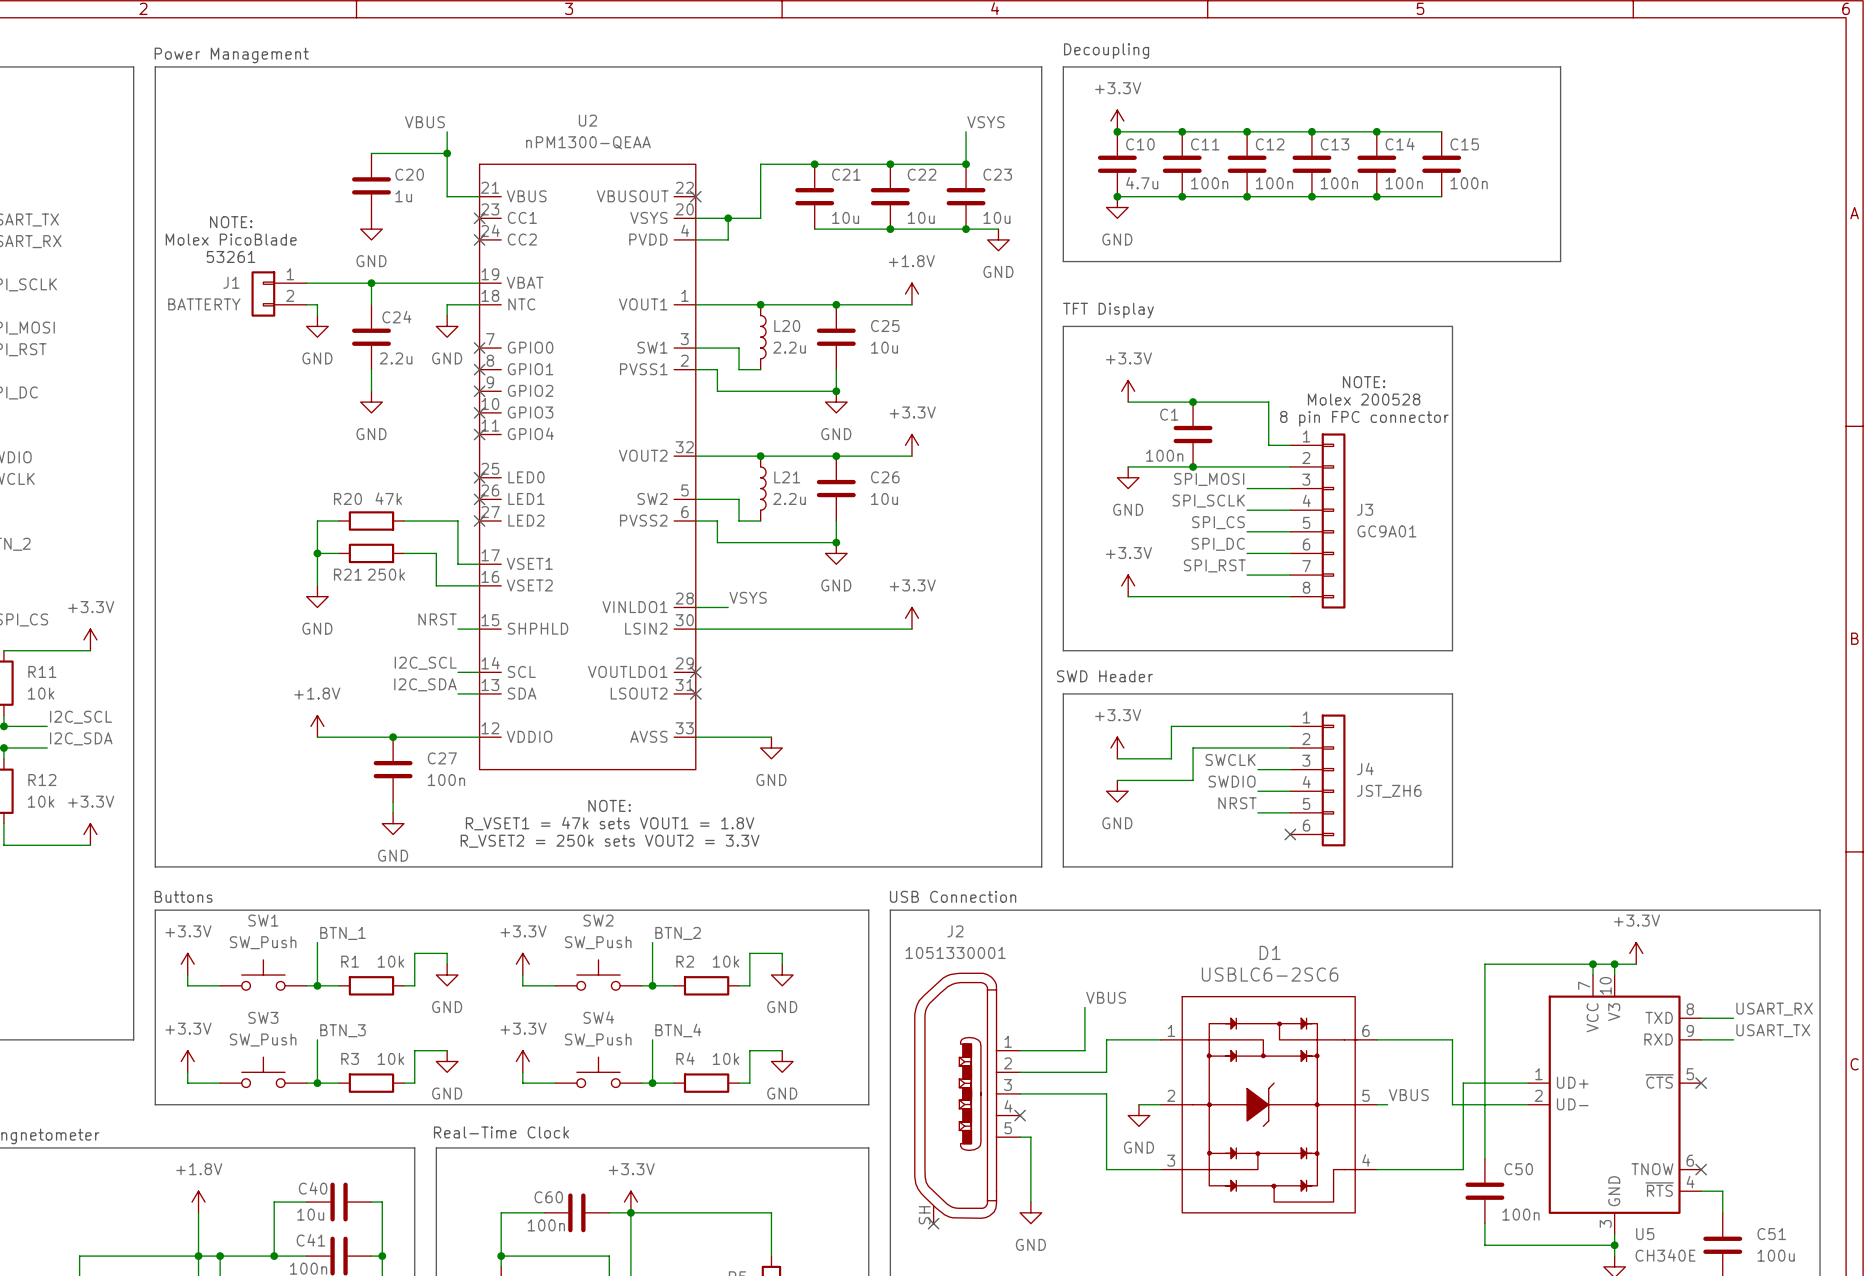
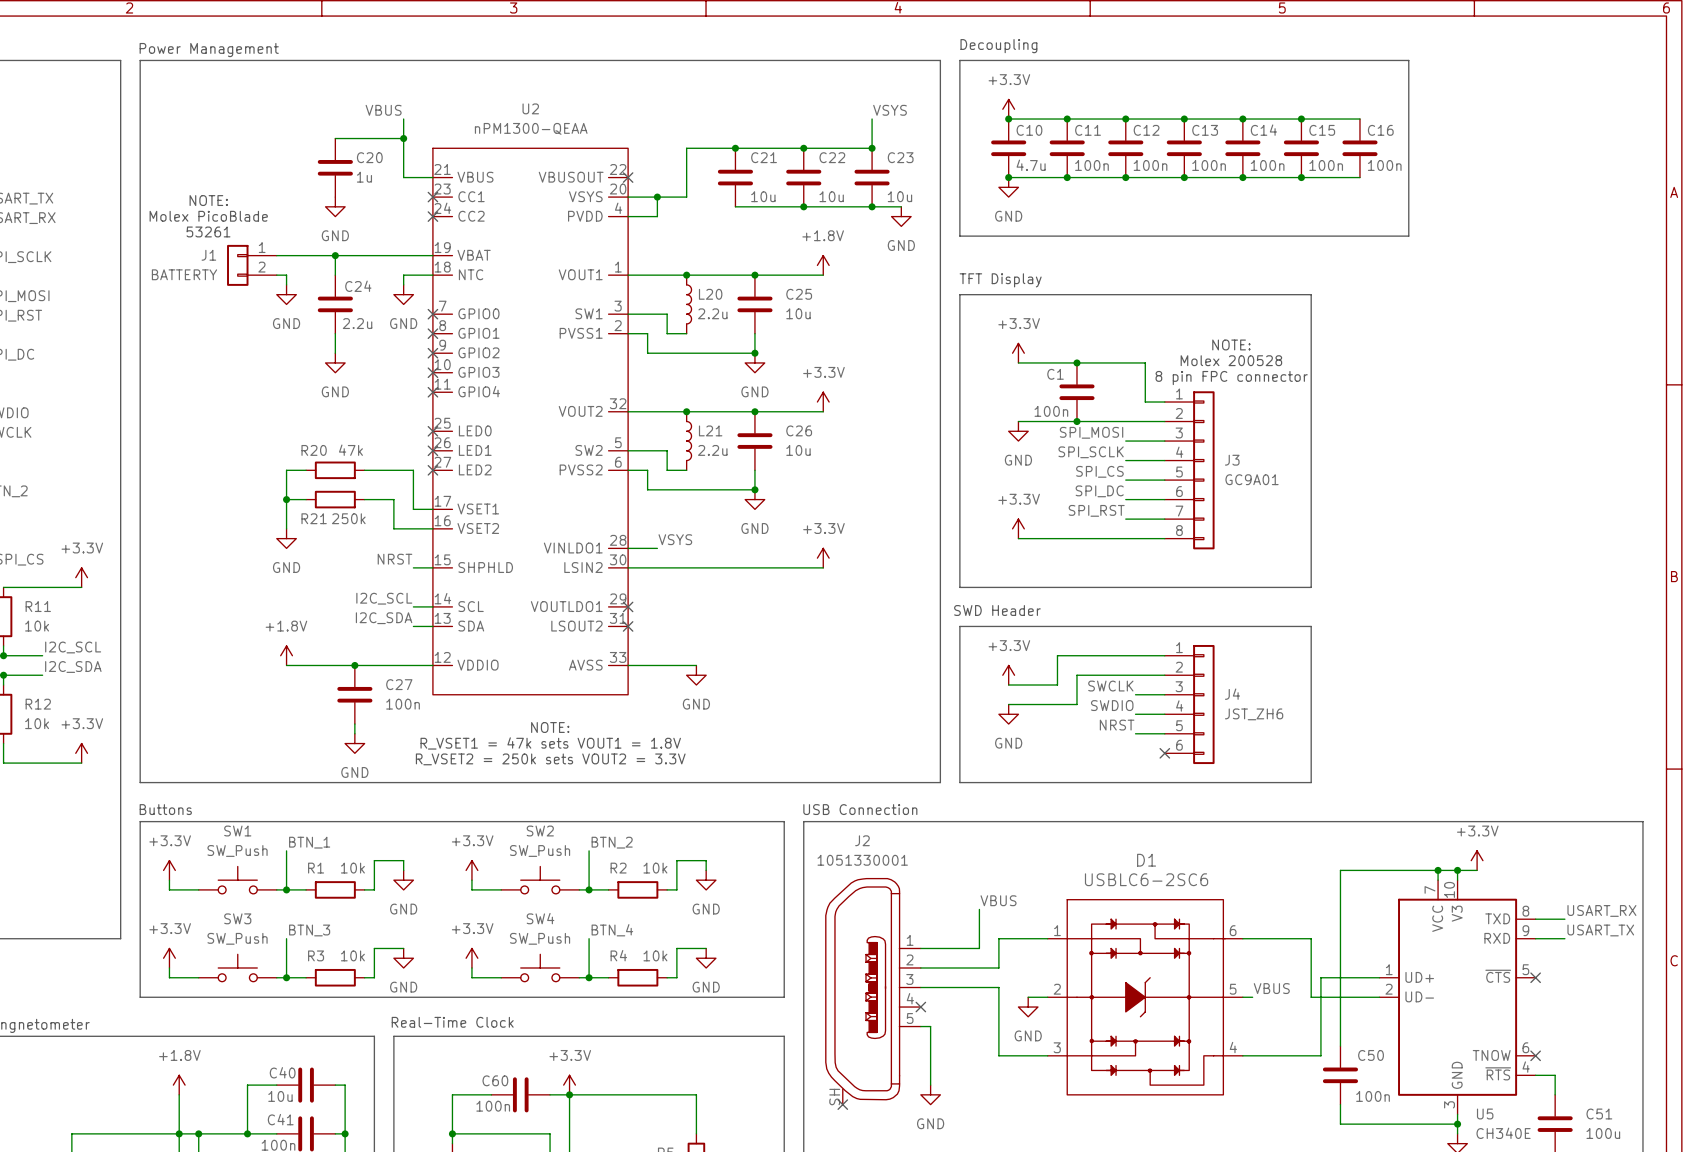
wire: none -> (1301, 119) (1359, 119)
junction: none -> (1301, 119)
C16: none -> 100n (1359, 148)
wire: none -> (1301, 177) (1359, 177)
junction: none -> (1301, 177)

